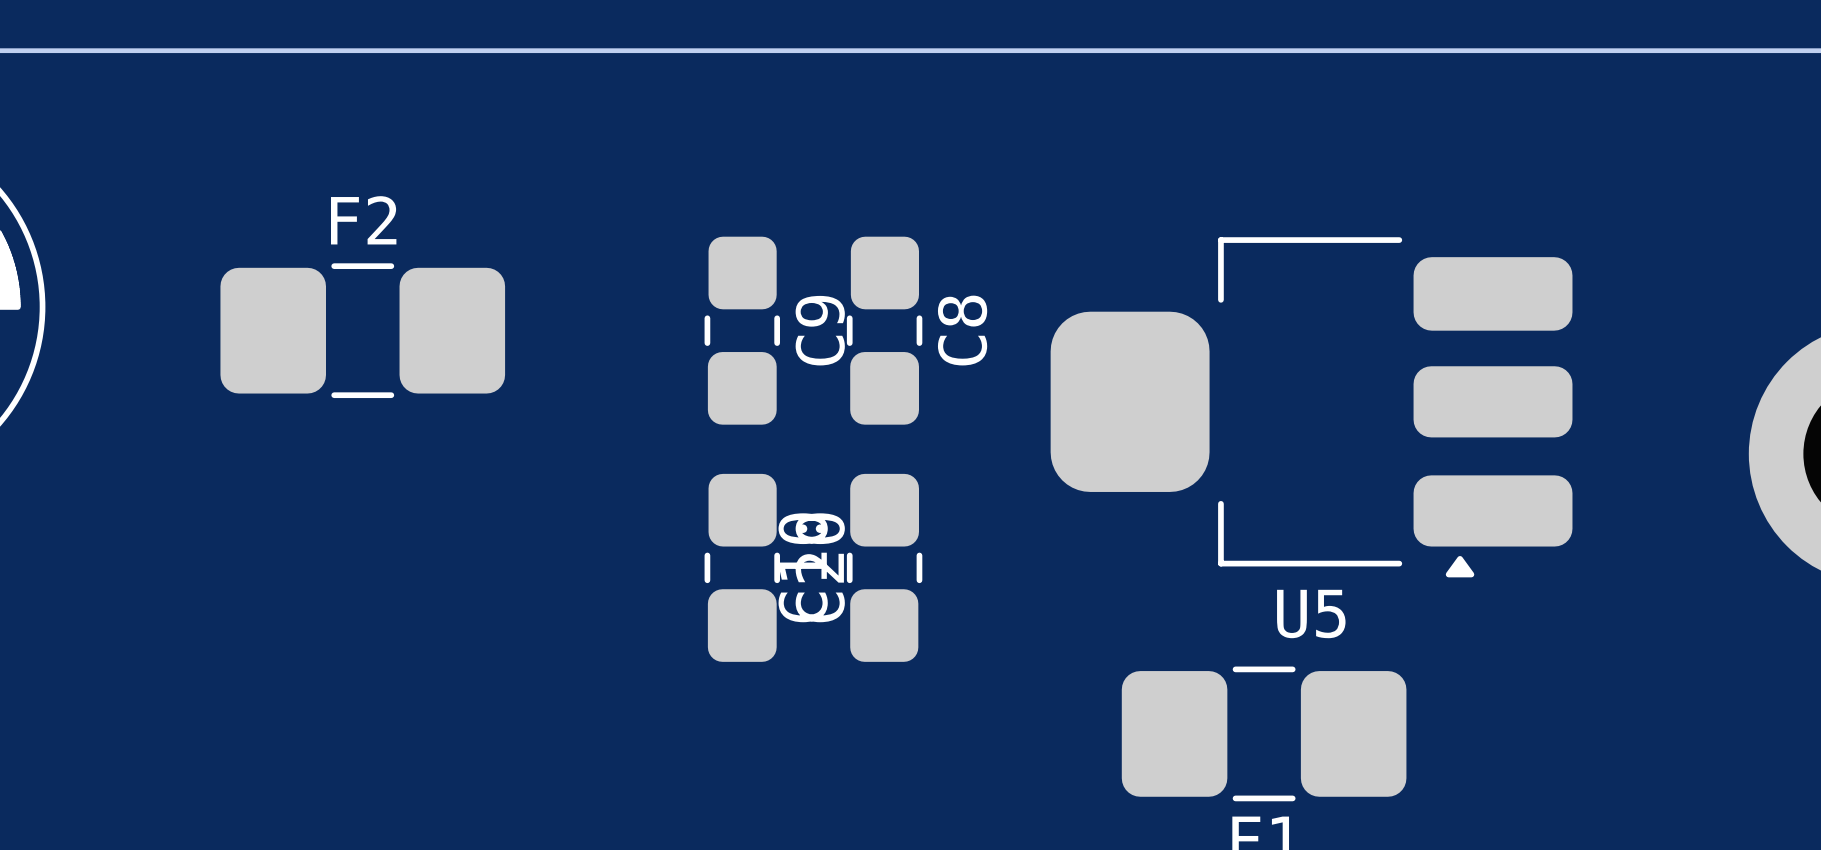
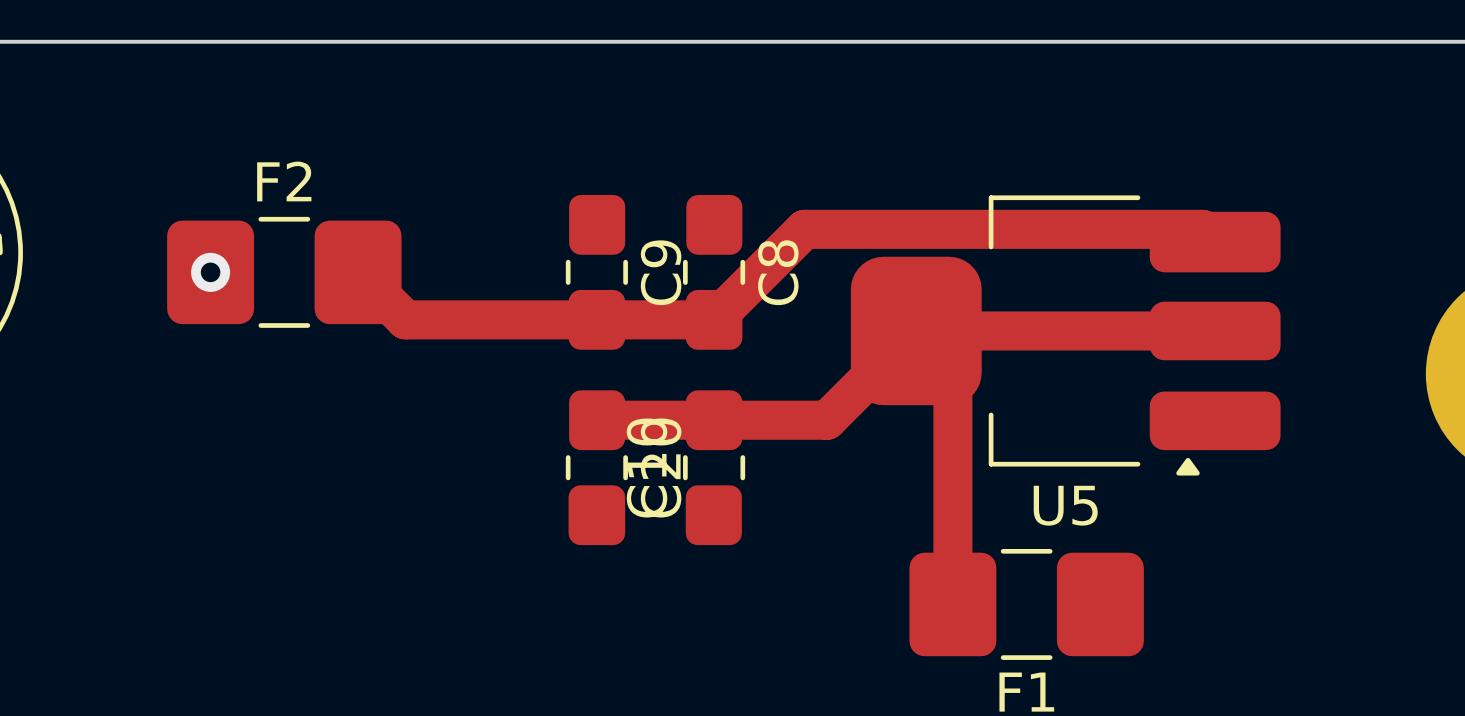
track: none -> (1215, 242) (1202, 229) (804, 229) (714, 319) (405, 319) (358, 272)
via: none -> (210, 272)
track: none -> (916, 330) (827, 420) (597, 420)
track: none -> (916, 330) (952, 367) (952, 604)
track: none -> (916, 330) (1215, 330)

